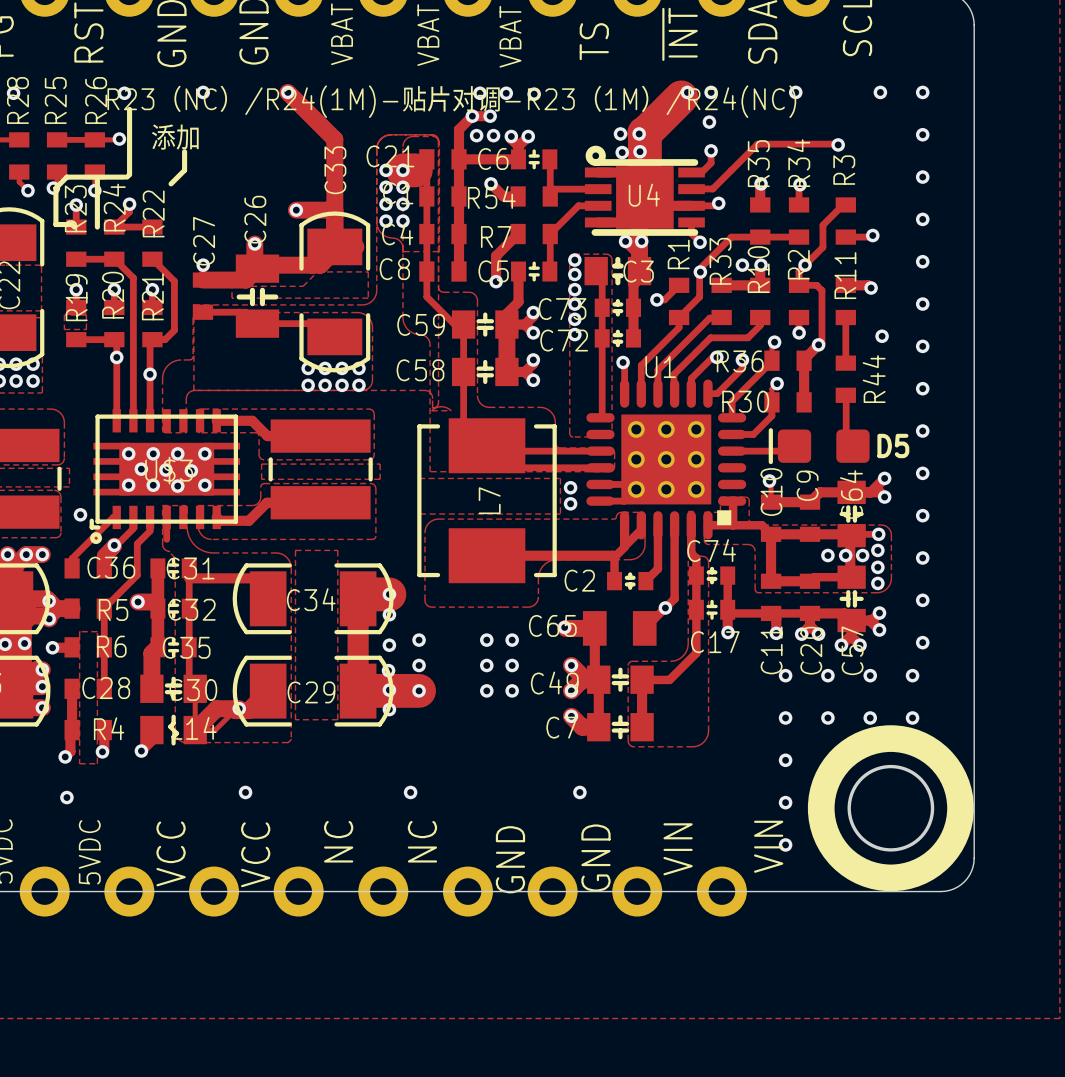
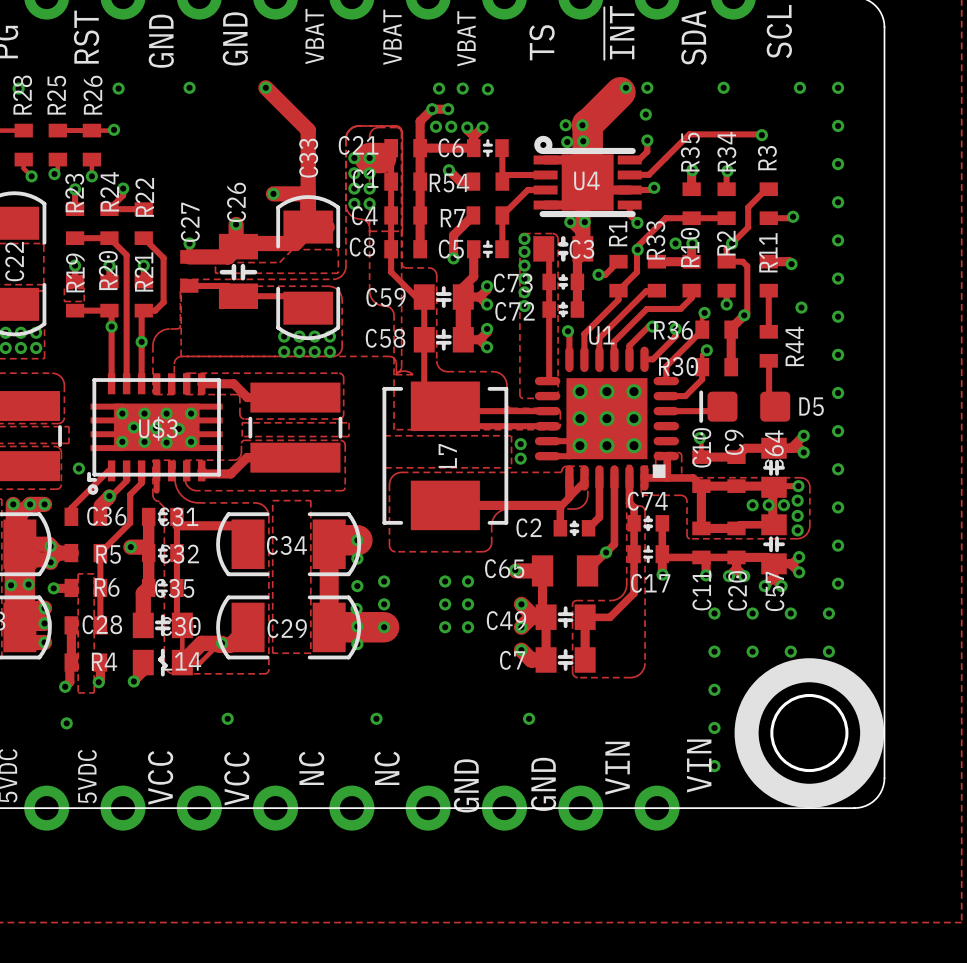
text: R23（NC）/R24(1M)-贴片对调-R23（1M）/R24(NC) (451, 101) -> none
line: (129, 109) (129, 174) (127, 177) -> none
text: 添加 (175, 137) -> none
line: (184, 151) (184, 170) (171, 183) -> none
line: (124, 177) (66, 177) (55, 188) (55, 224) (72, 224) (74, 227) -> none
line: (97, 179) (97, 227) -> none

